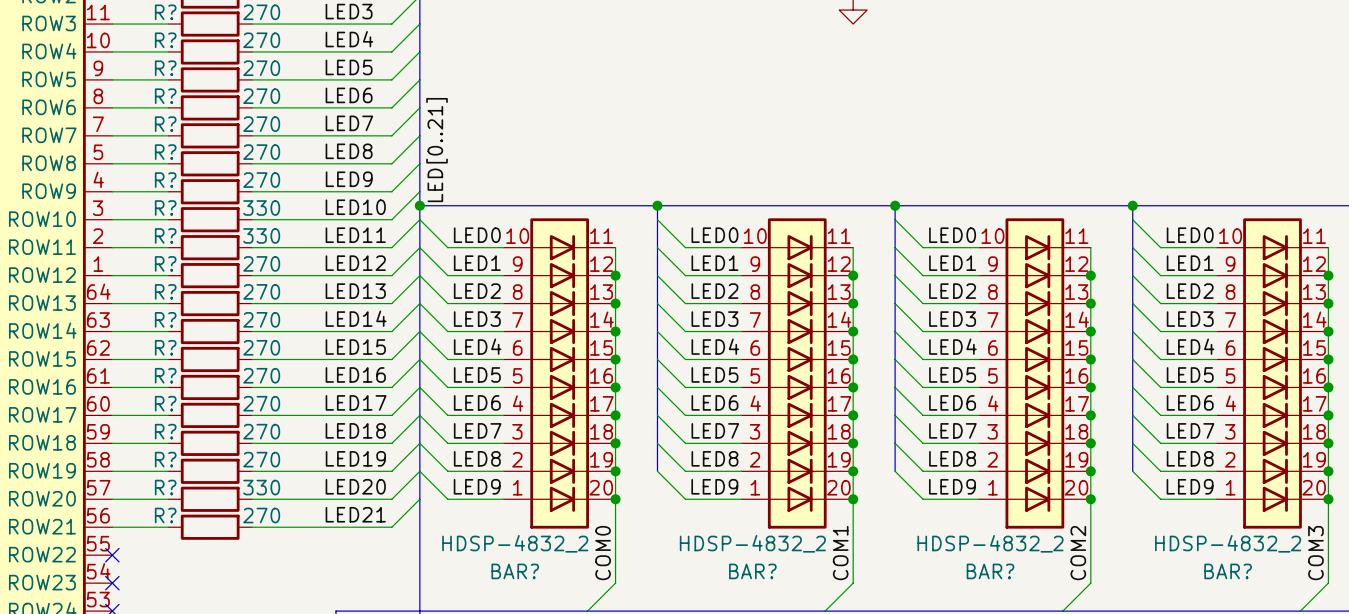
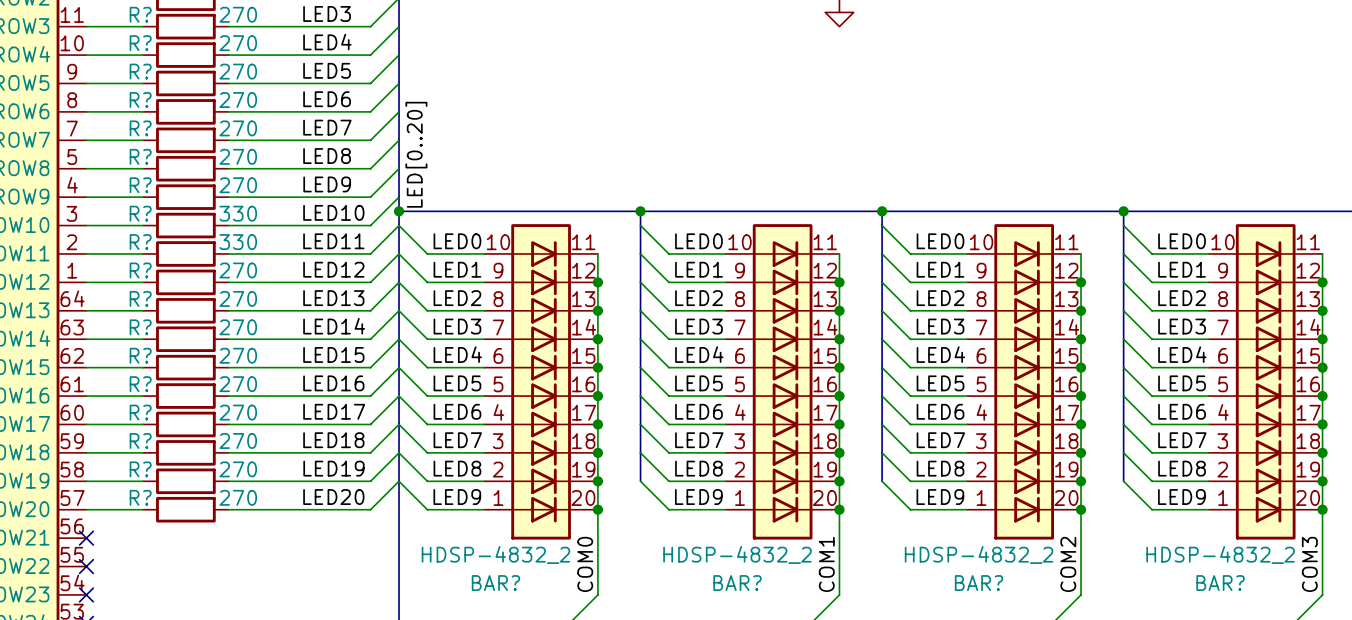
label: LED[0..21] (437, 150) -> LED[0..20] (416, 154)
R? value: 330 (261, 487) -> 270 (238, 497)
wire: (419, 499) (391, 527) (252, 527) -> none
label: LED21 (355, 514) -> none
wire: (112, 527) (168, 527) -> none
no-connect mark: none -> (86, 538)
R?: 270 (210, 527) -> none

